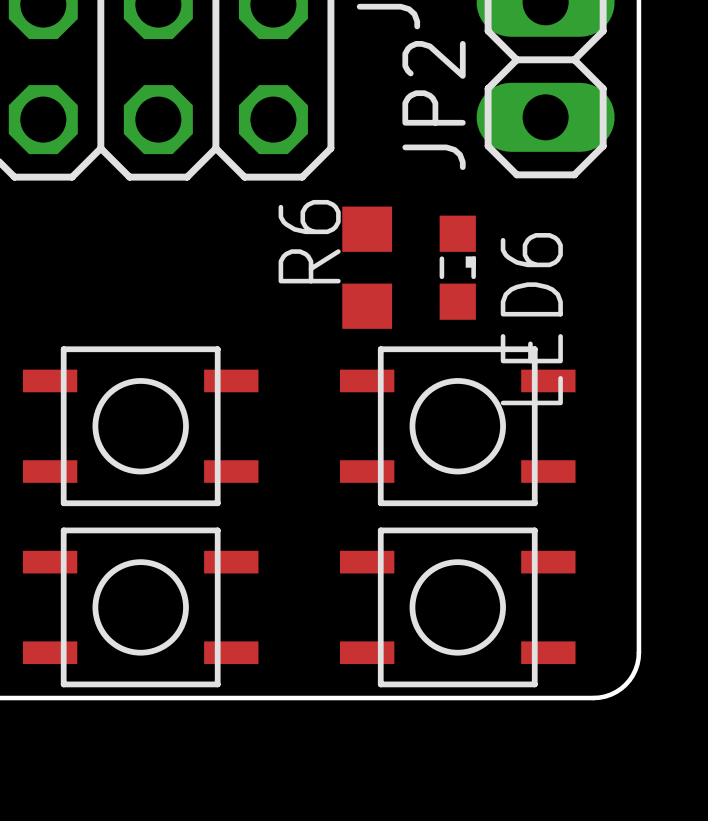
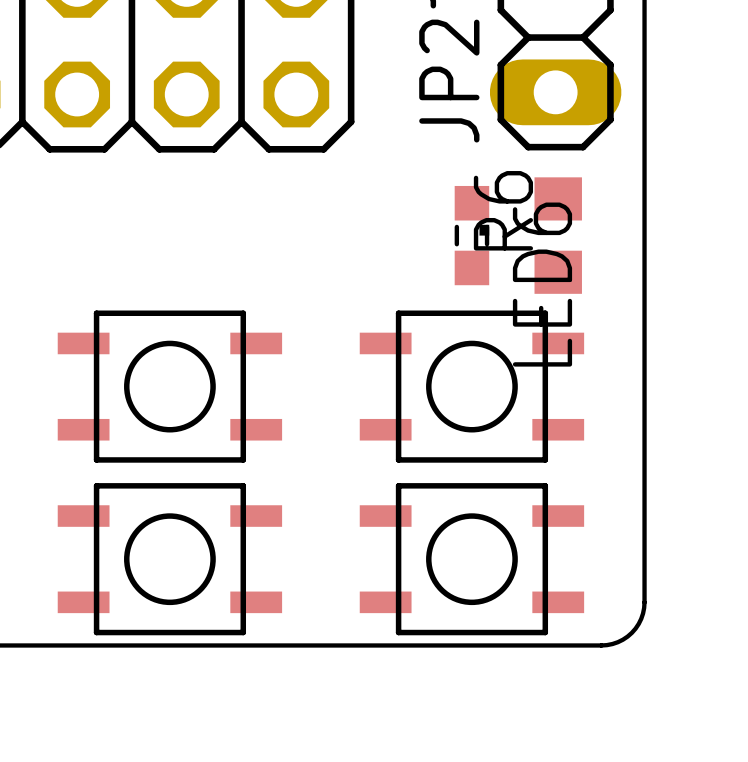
R6 position: (367, 267) -> (558, 235)

